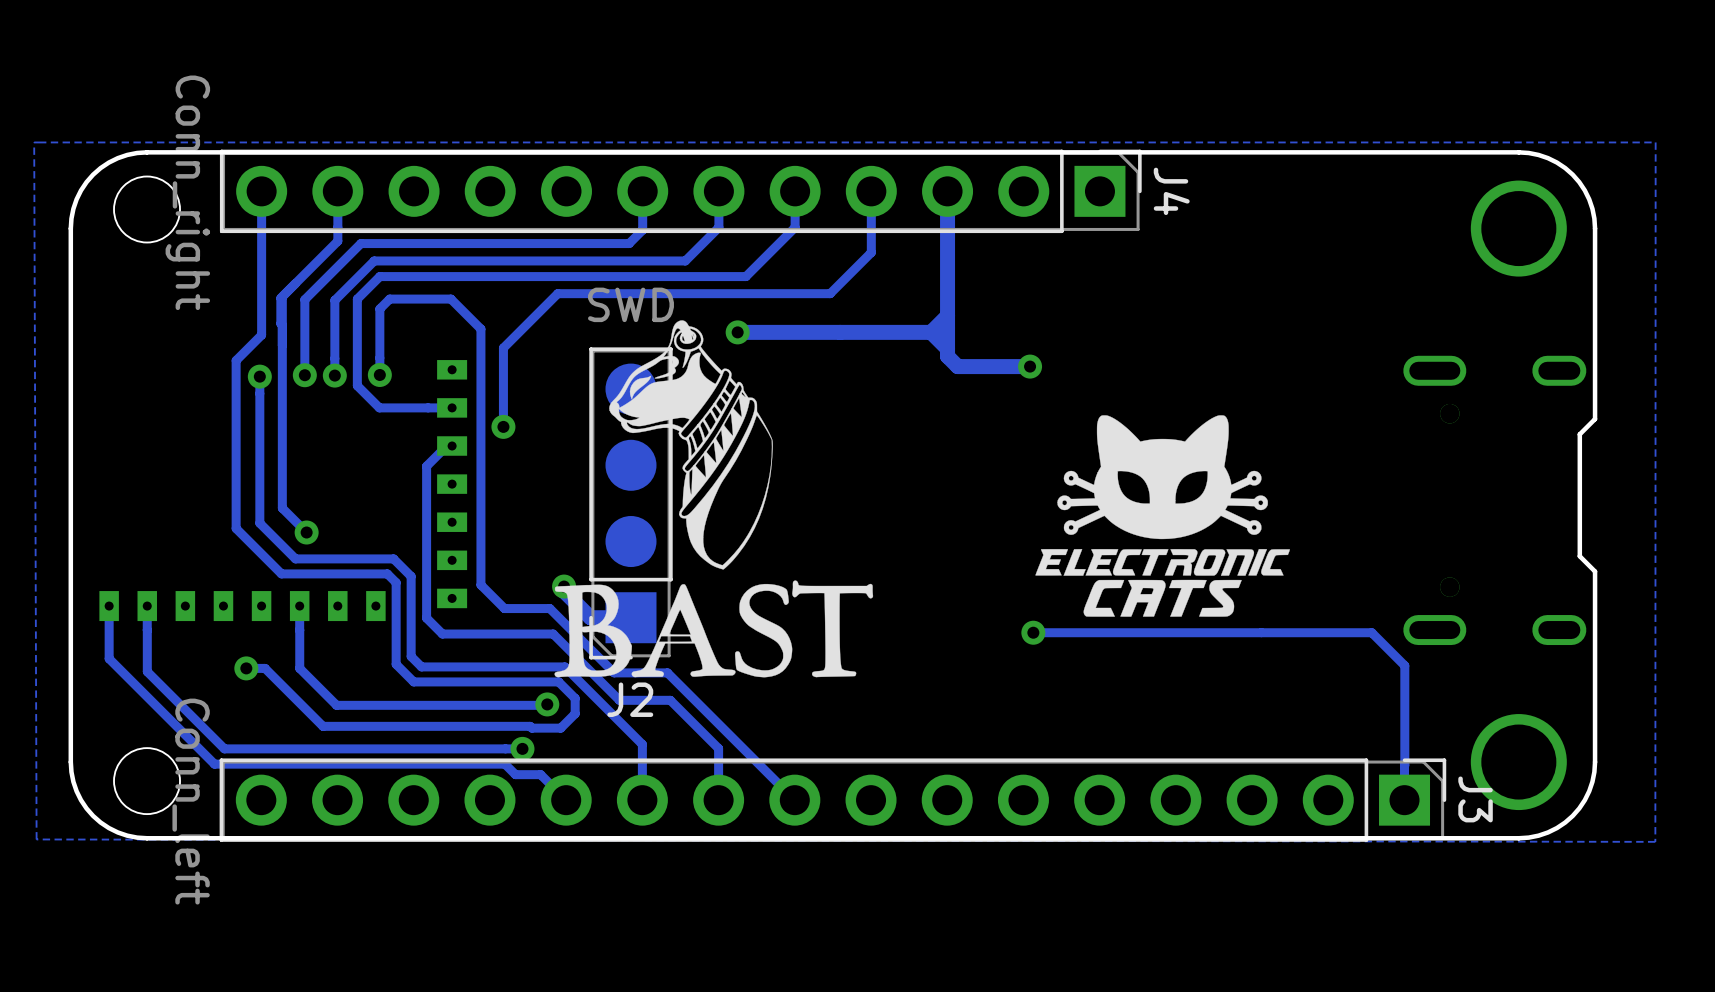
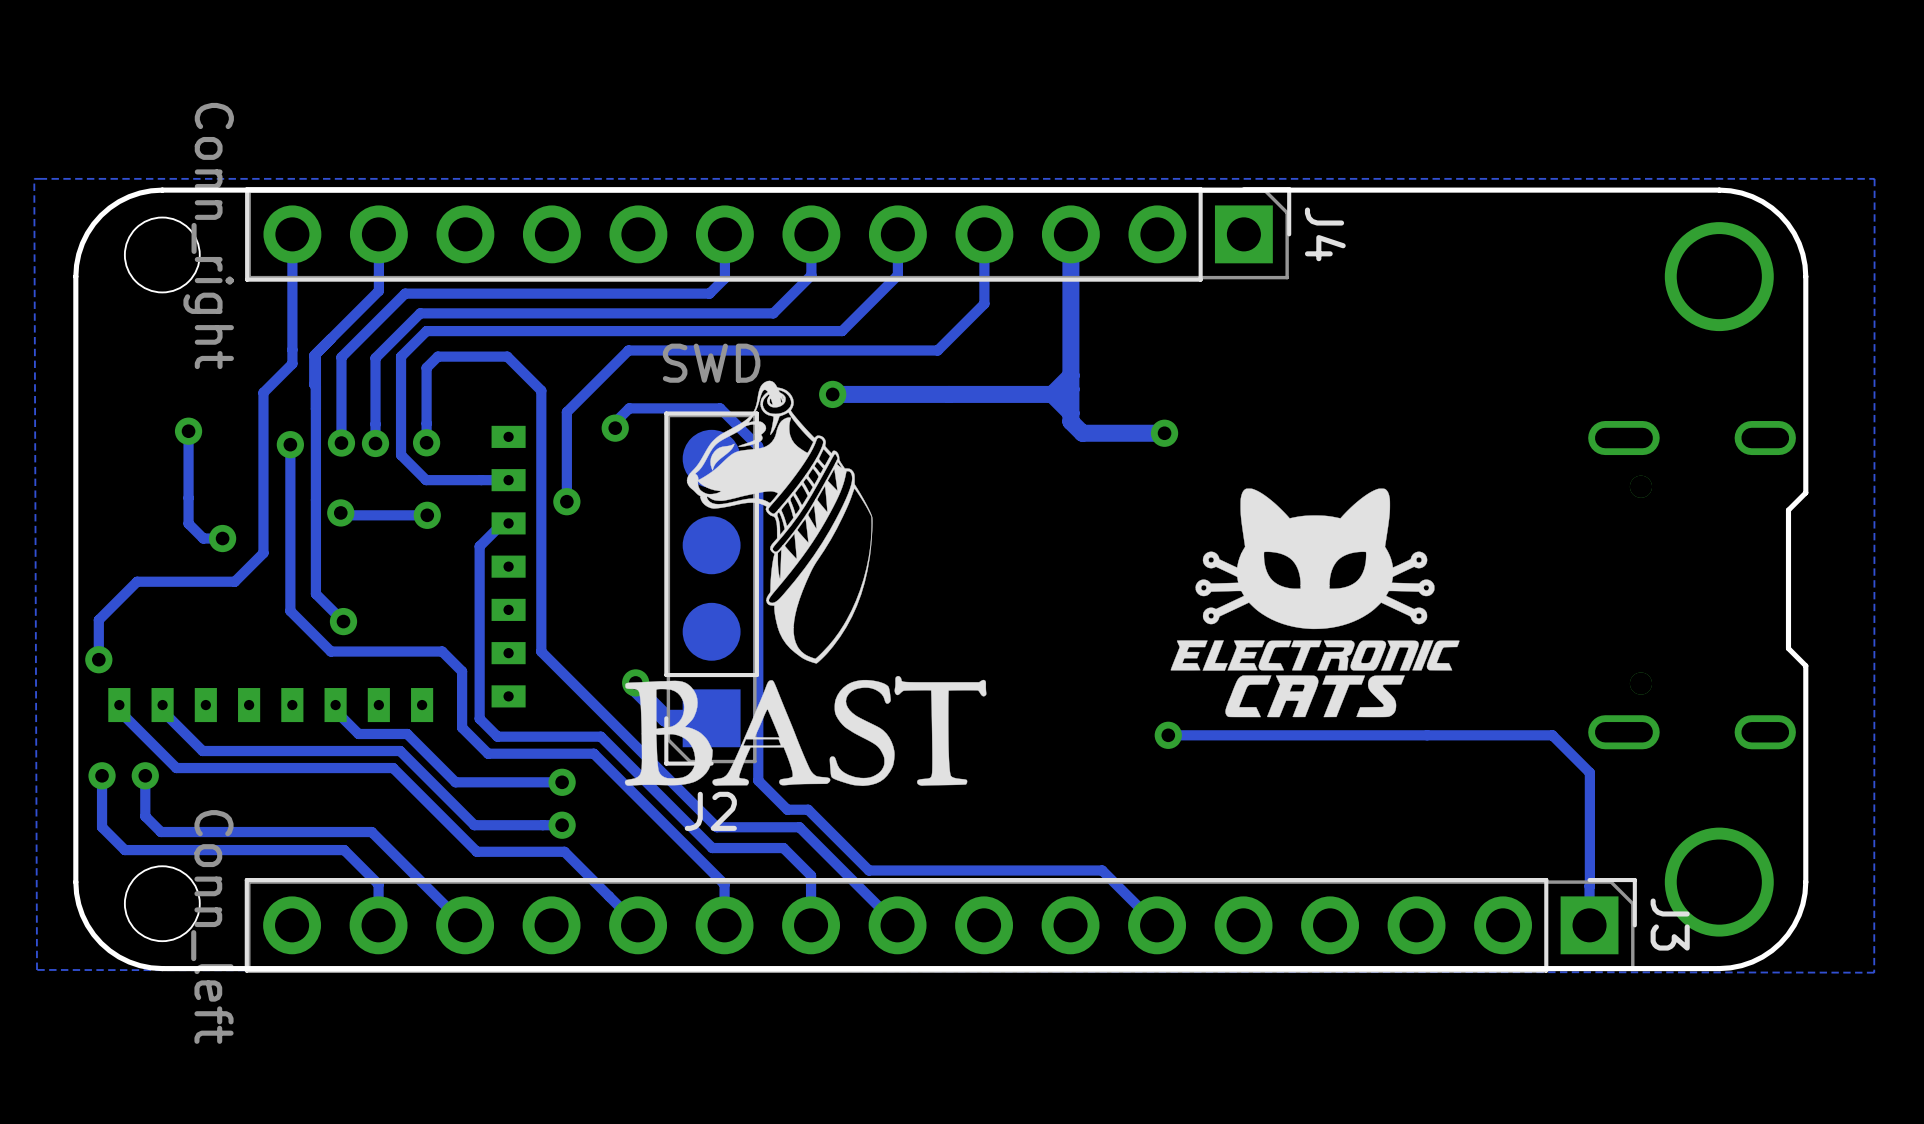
track: (261, 305) (261, 335) (236, 360) -> (292, 363) (263, 392) (263, 426)
track: none -> (615, 428) (615, 422) (629, 408) (720, 408) (758, 446) (758, 780) (787, 809) (808, 809) (868, 870) (1102, 870) (1157, 925)
via: none -> (615, 428)
track: none -> (188, 431) (188, 523) (203, 538) (222, 538)
via: none -> (188, 431)
track: none -> (340, 512) (343, 515) (427, 515)
via: none -> (340, 512)
via: none -> (427, 515)
via: none -> (222, 538)
track: (236, 472) (236, 528) (281, 573) (387, 573) (396, 582) (396, 664) (413, 681) (558, 681) (575, 698) (575, 713) (560, 728) (531, 728) (530, 726) (323, 726) (265, 668) (246, 668) -> (263, 553) (234, 581) (137, 581) (98, 620) (98, 659)
track: (480, 559) (480, 584) (504, 608) (549, 608) (614, 672) (667, 672) (708, 713) -> (541, 651) (716, 827) (799, 827)
via: none -> (98, 659)
track: (109, 611) (109, 658) (214, 764) (505, 764) (515, 774) (540, 774) -> (119, 711) (176, 768) (393, 768) (476, 851) (564, 851) (609, 896)
track: (147, 611) (147, 671) (224, 748) (522, 748) -> (162, 711) (202, 751) (400, 751) (474, 825) (562, 825)
track: (299, 611) (299, 668) (336, 705) (547, 704) -> (335, 711) (358, 733) (407, 733) (455, 782) (562, 782)
track: (411, 626) (411, 656) (421, 666) (564, 666) (642, 744) (642, 764) -> (462, 727) (488, 753) (593, 753) (724, 884)
track: (533, 633) (553, 634) (619, 700) (670, 700) (718, 748) (718, 756) -> (600, 736) (712, 848) (783, 848) (811, 875)
track: none -> (102, 775) (102, 827) (124, 850) (344, 850) (378, 884) (378, 925)
via: none -> (102, 775)
track: none -> (145, 775) (145, 816) (160, 832) (371, 832) (465, 925)
via: none -> (145, 775)
via: (246, 668) -> none
via: none -> (562, 782)
via: (547, 704) -> none
via: none -> (562, 825)
via: (522, 748) -> none

